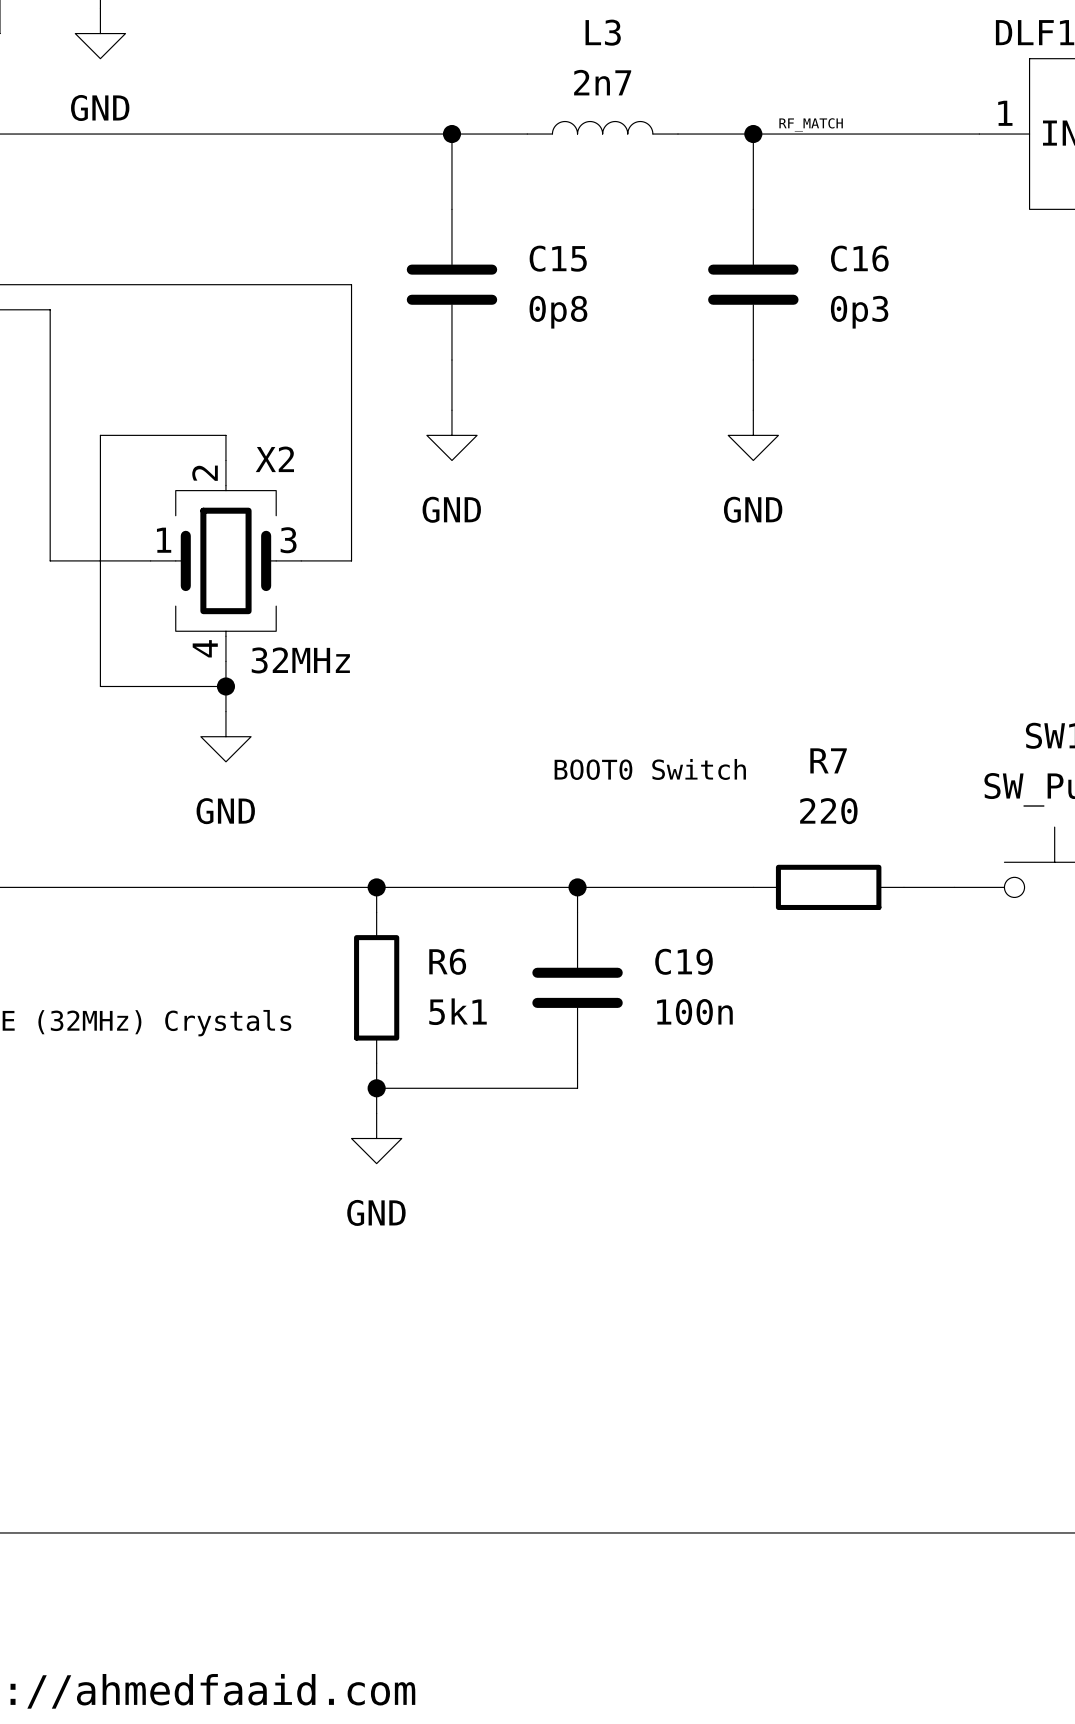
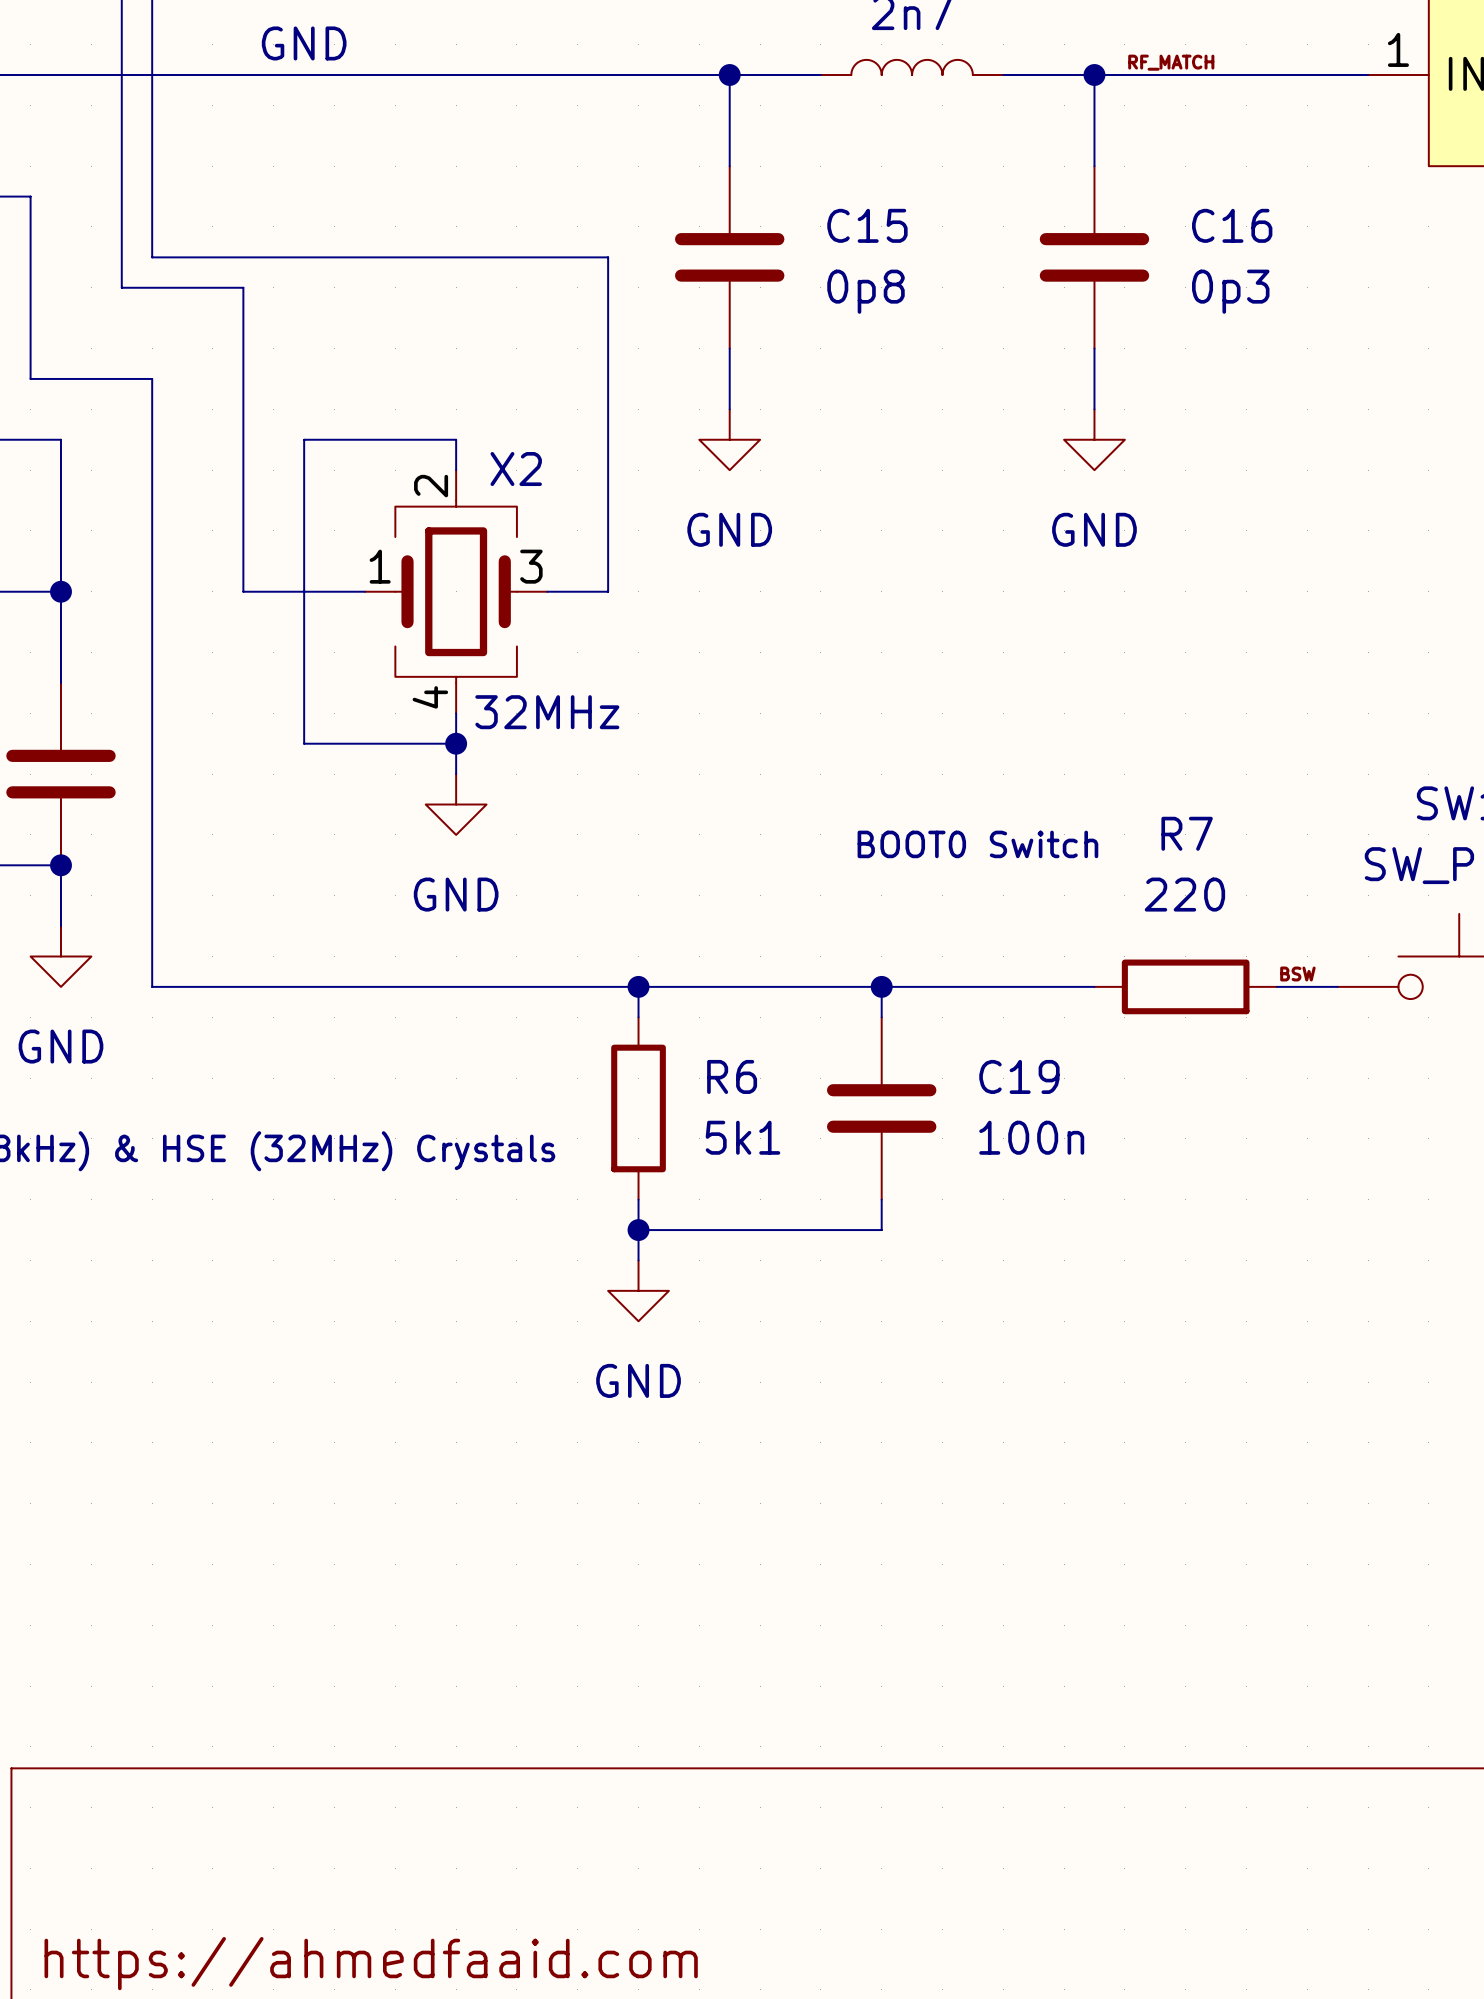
label: none -> BSW (1297, 974)

